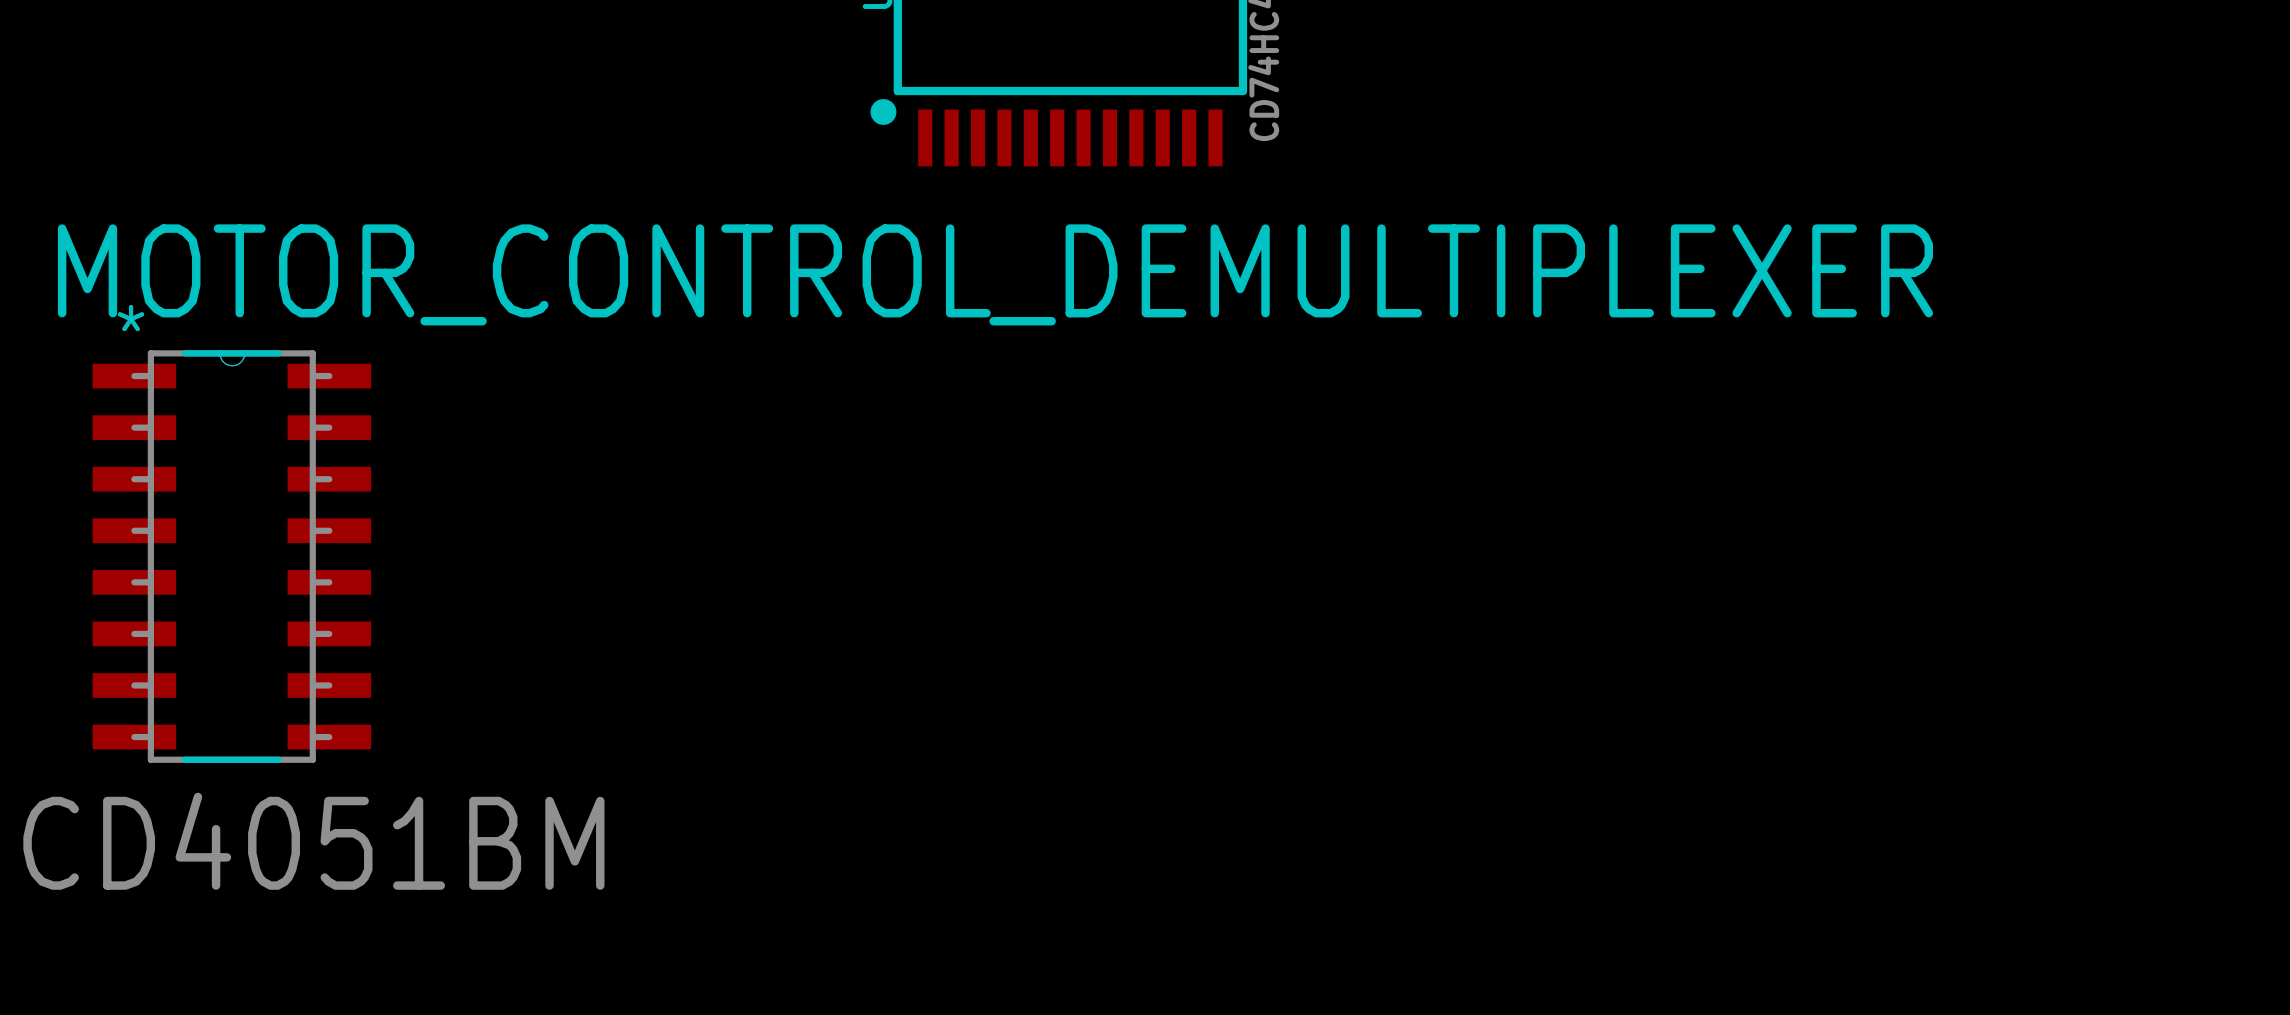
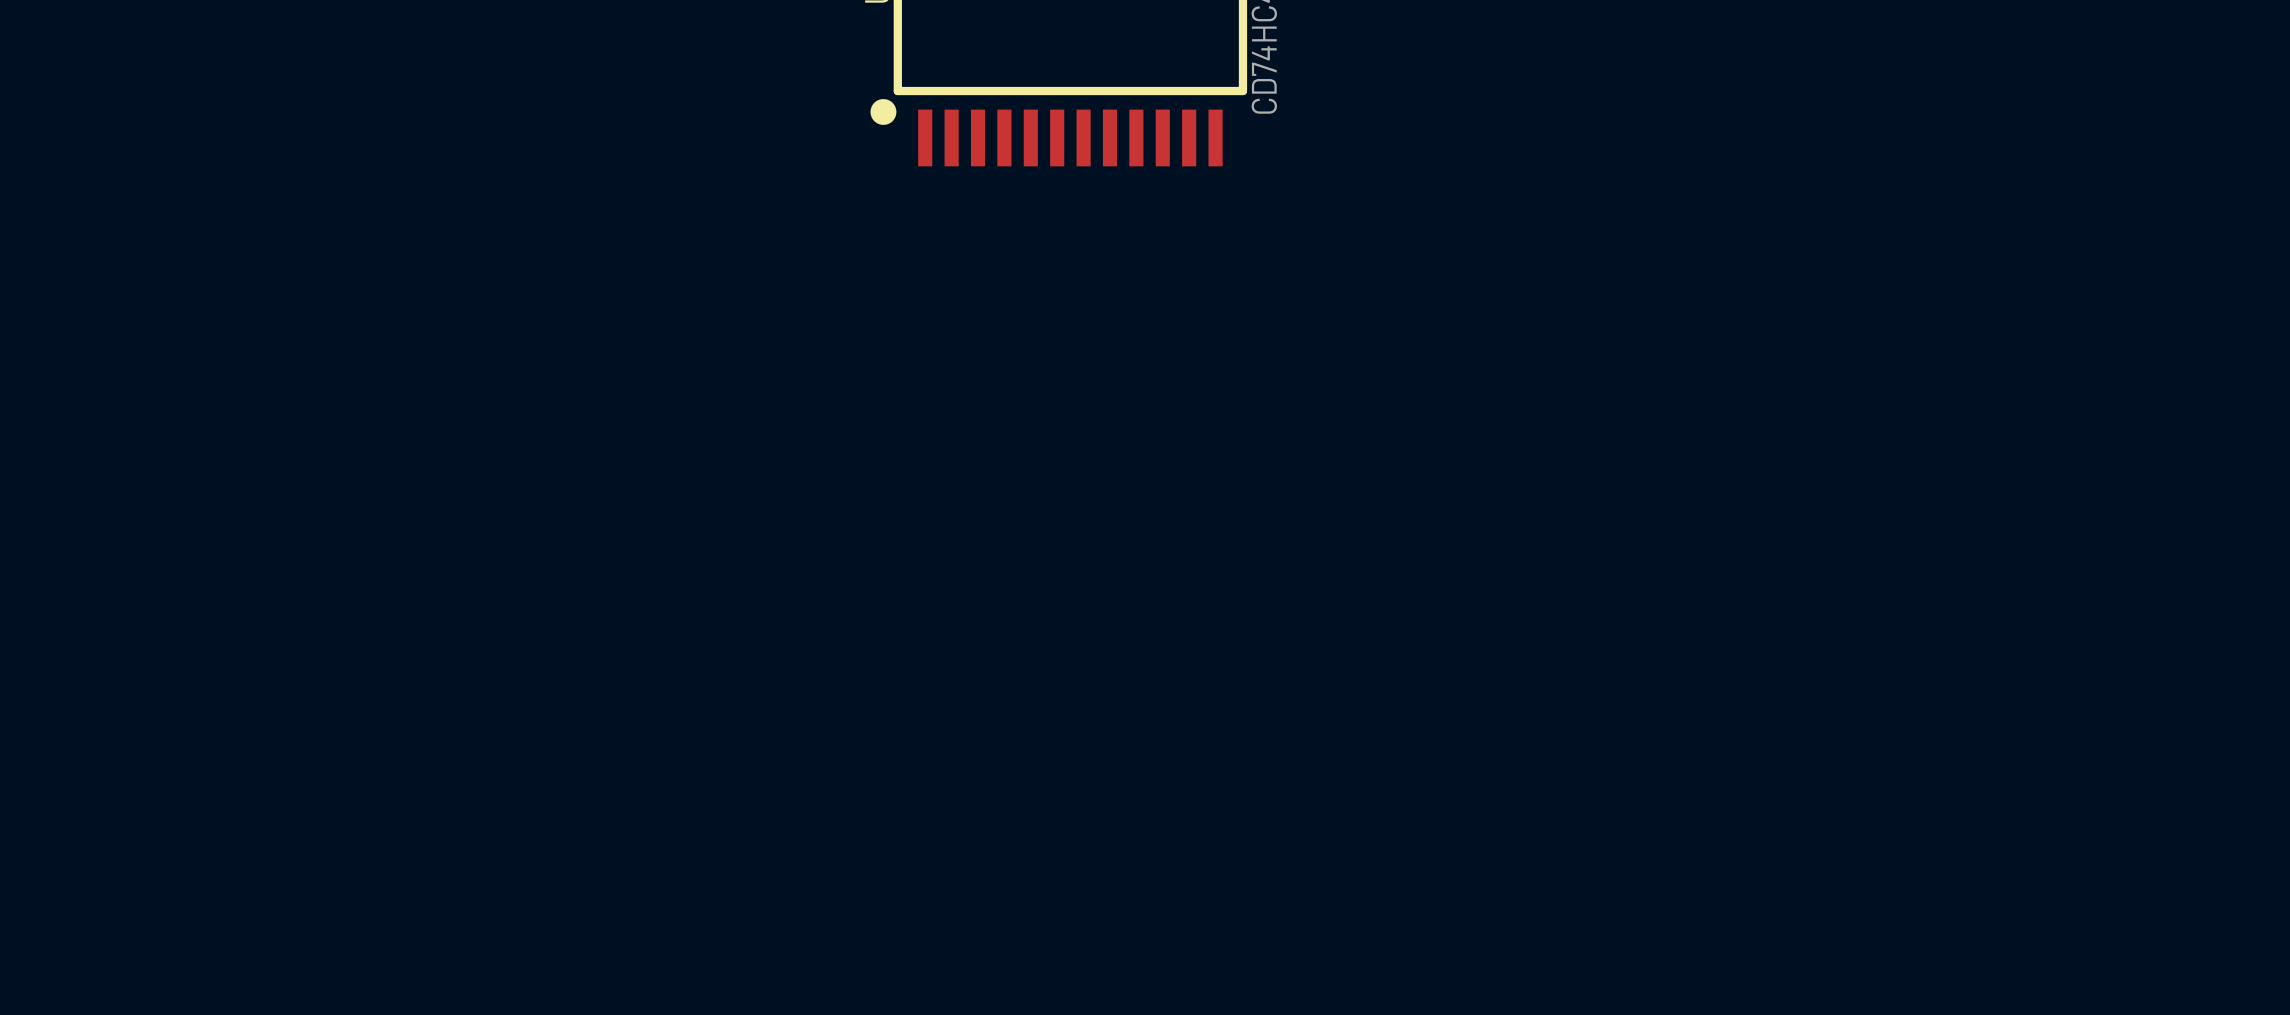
MOTOR_CONTROL_DEMULTIPLEXER: CD4051BM (231, 556) -> none

